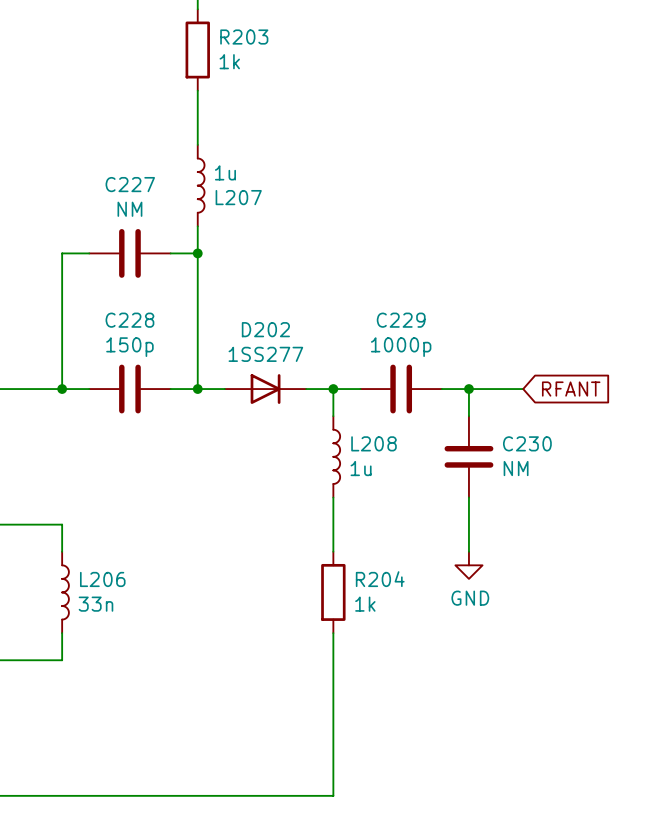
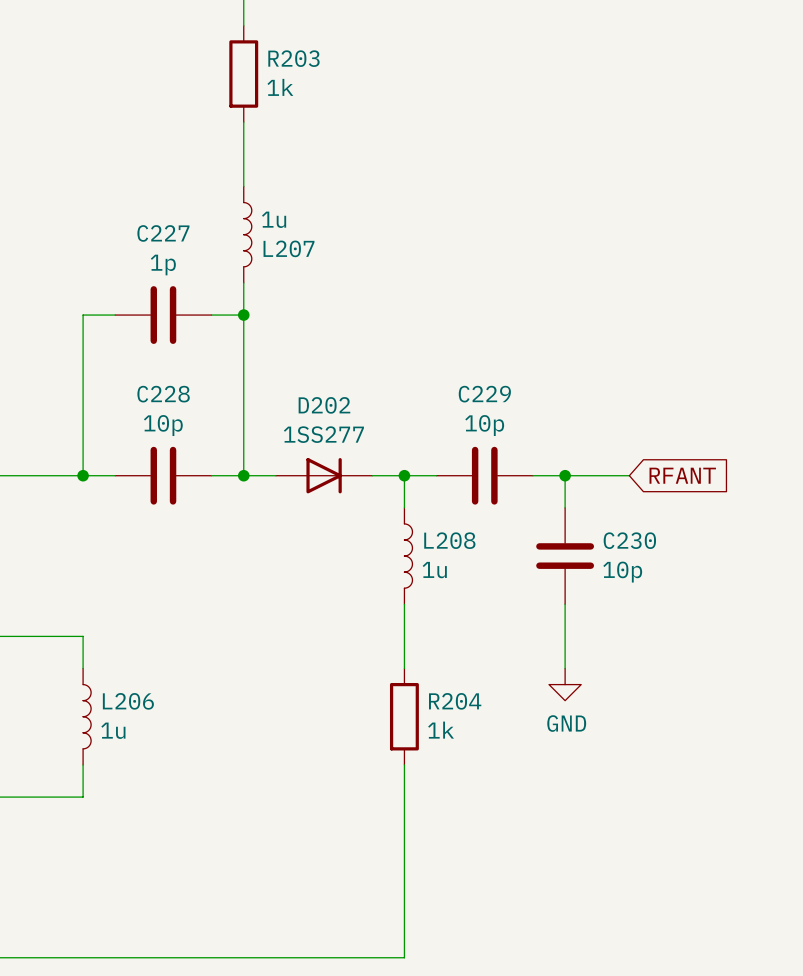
C227 value: NM (129, 209) -> 1p (163, 265)
C228 value: 150p (129, 347) -> 10p (163, 425)
C229 value: 1000p (401, 347) -> 10p (484, 425)
C230 value: NM (516, 468) -> 10p (622, 572)
L206 value: 33n (95, 604) -> 1u (113, 730)

